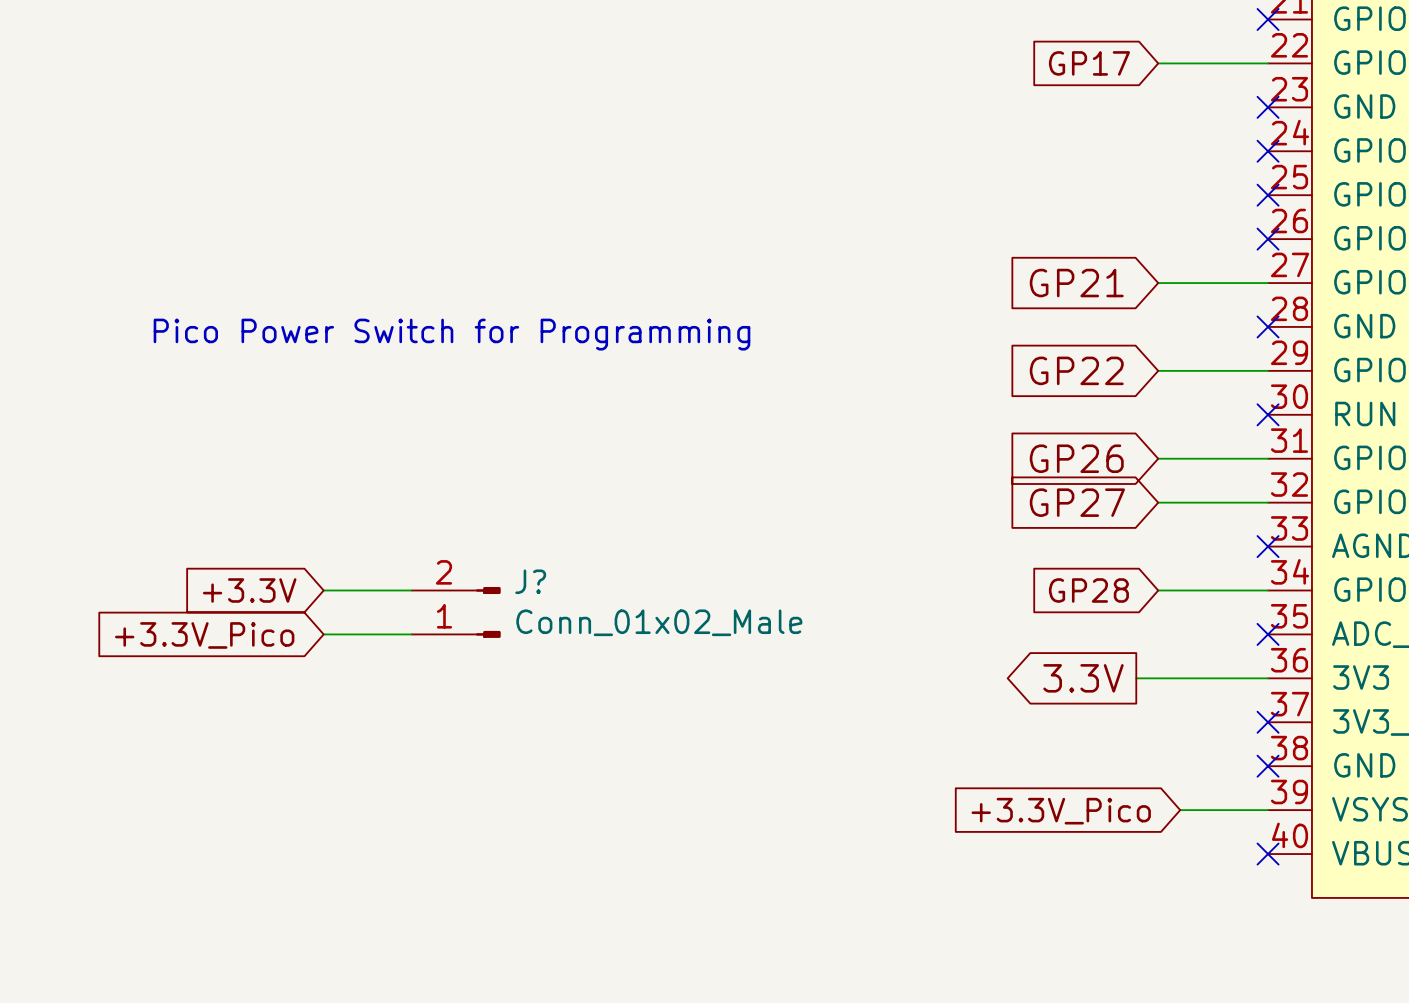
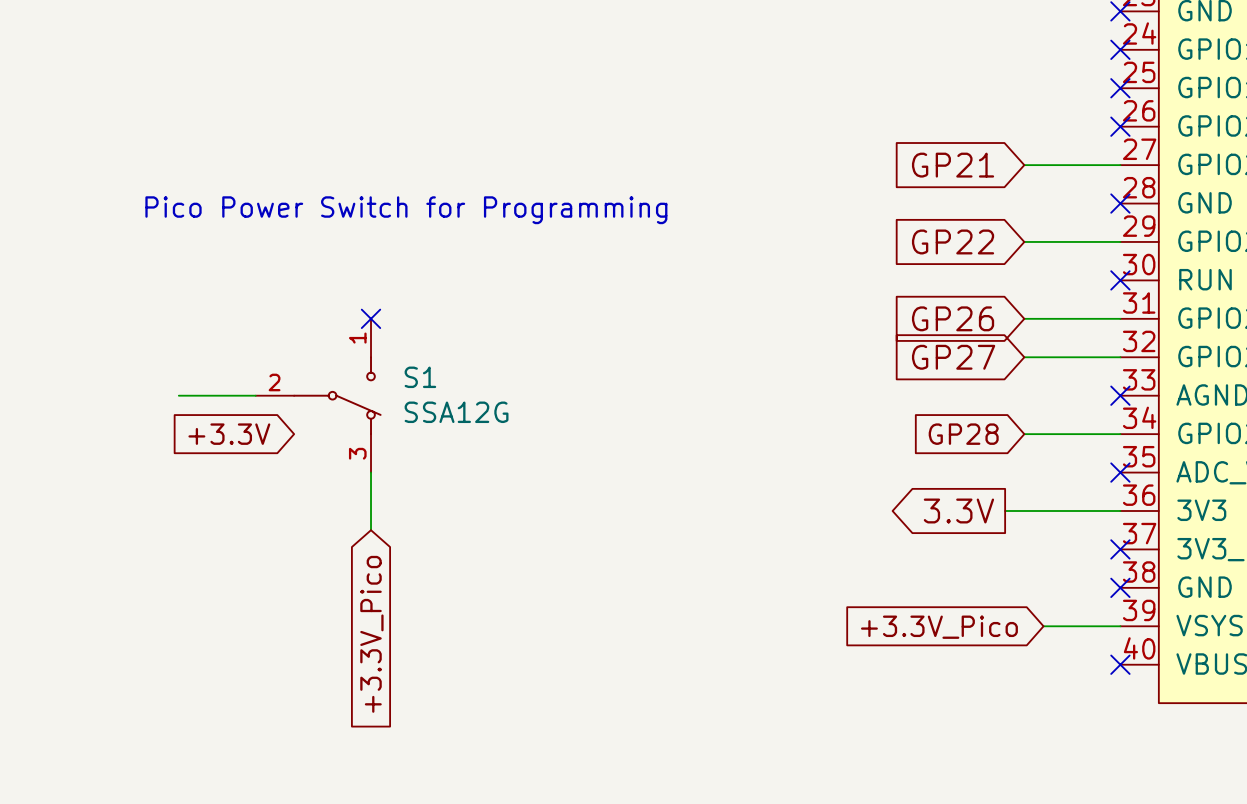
no-connect mark: none -> (371, 318)
S1: none -> SSA12G (318, 395)
wire: (323, 590) (411, 590) -> (178, 395) (255, 395)
J?: Conn_01x02_Male (456, 612) -> none
wire: (323, 634) (411, 634) -> (371, 530) (371, 472)
global label rotation: 0° (204, 635) -> 90° counterclockwise (371, 634)
global label position: +3.3V_Pico (204, 635) -> +3.3V_Pico (371, 634)

